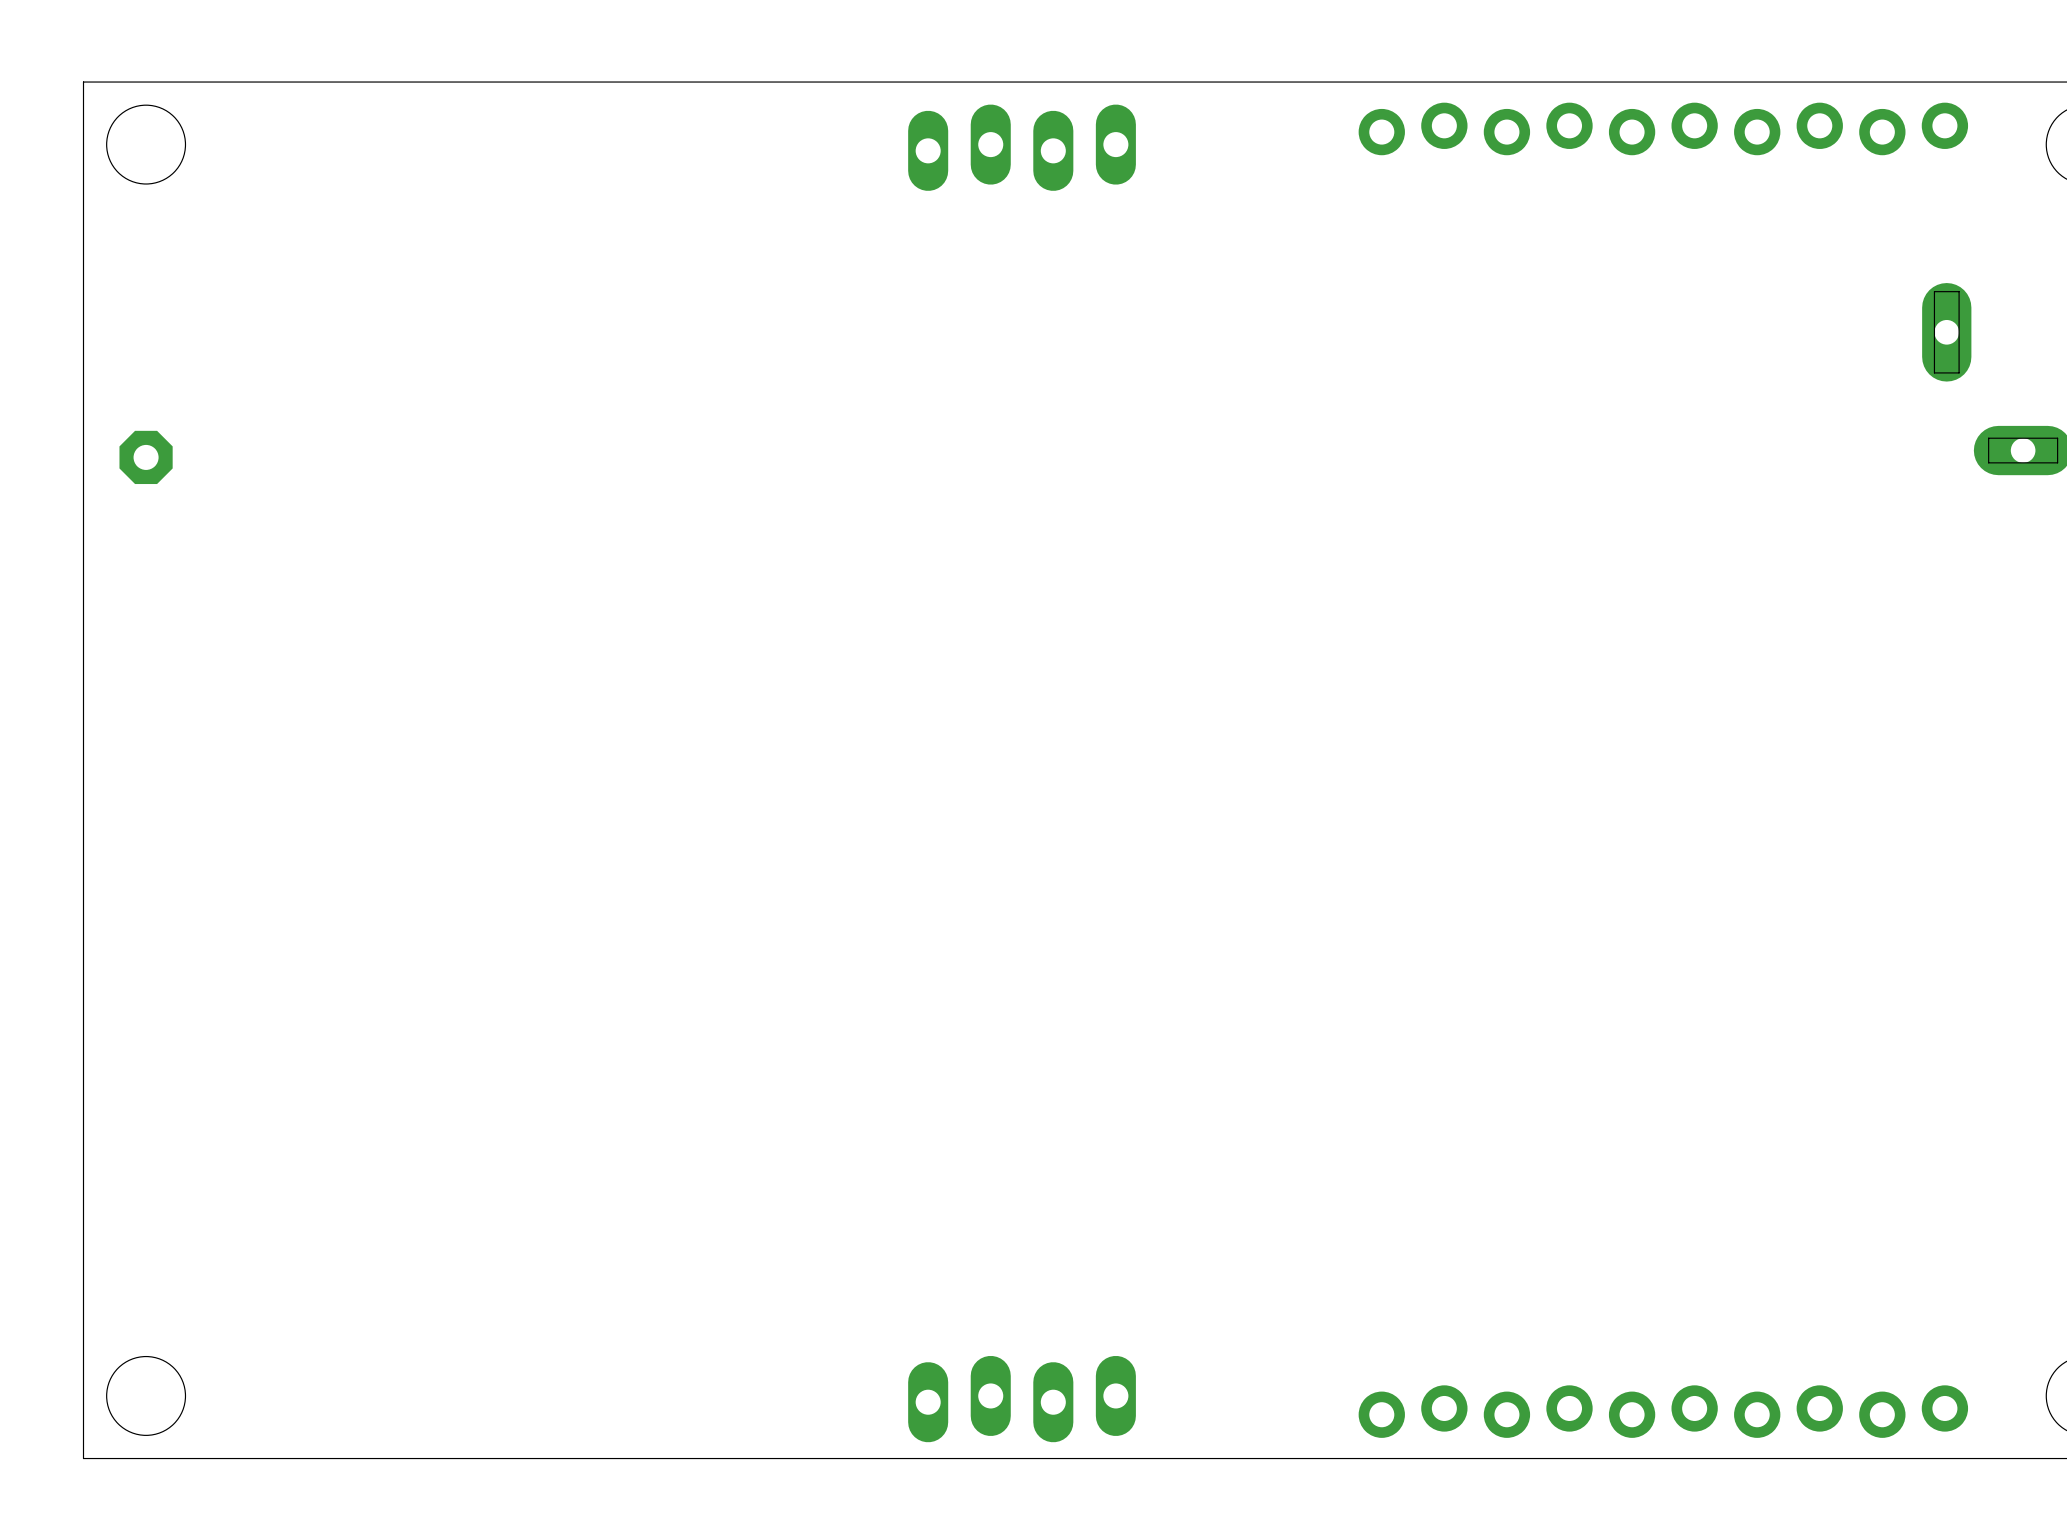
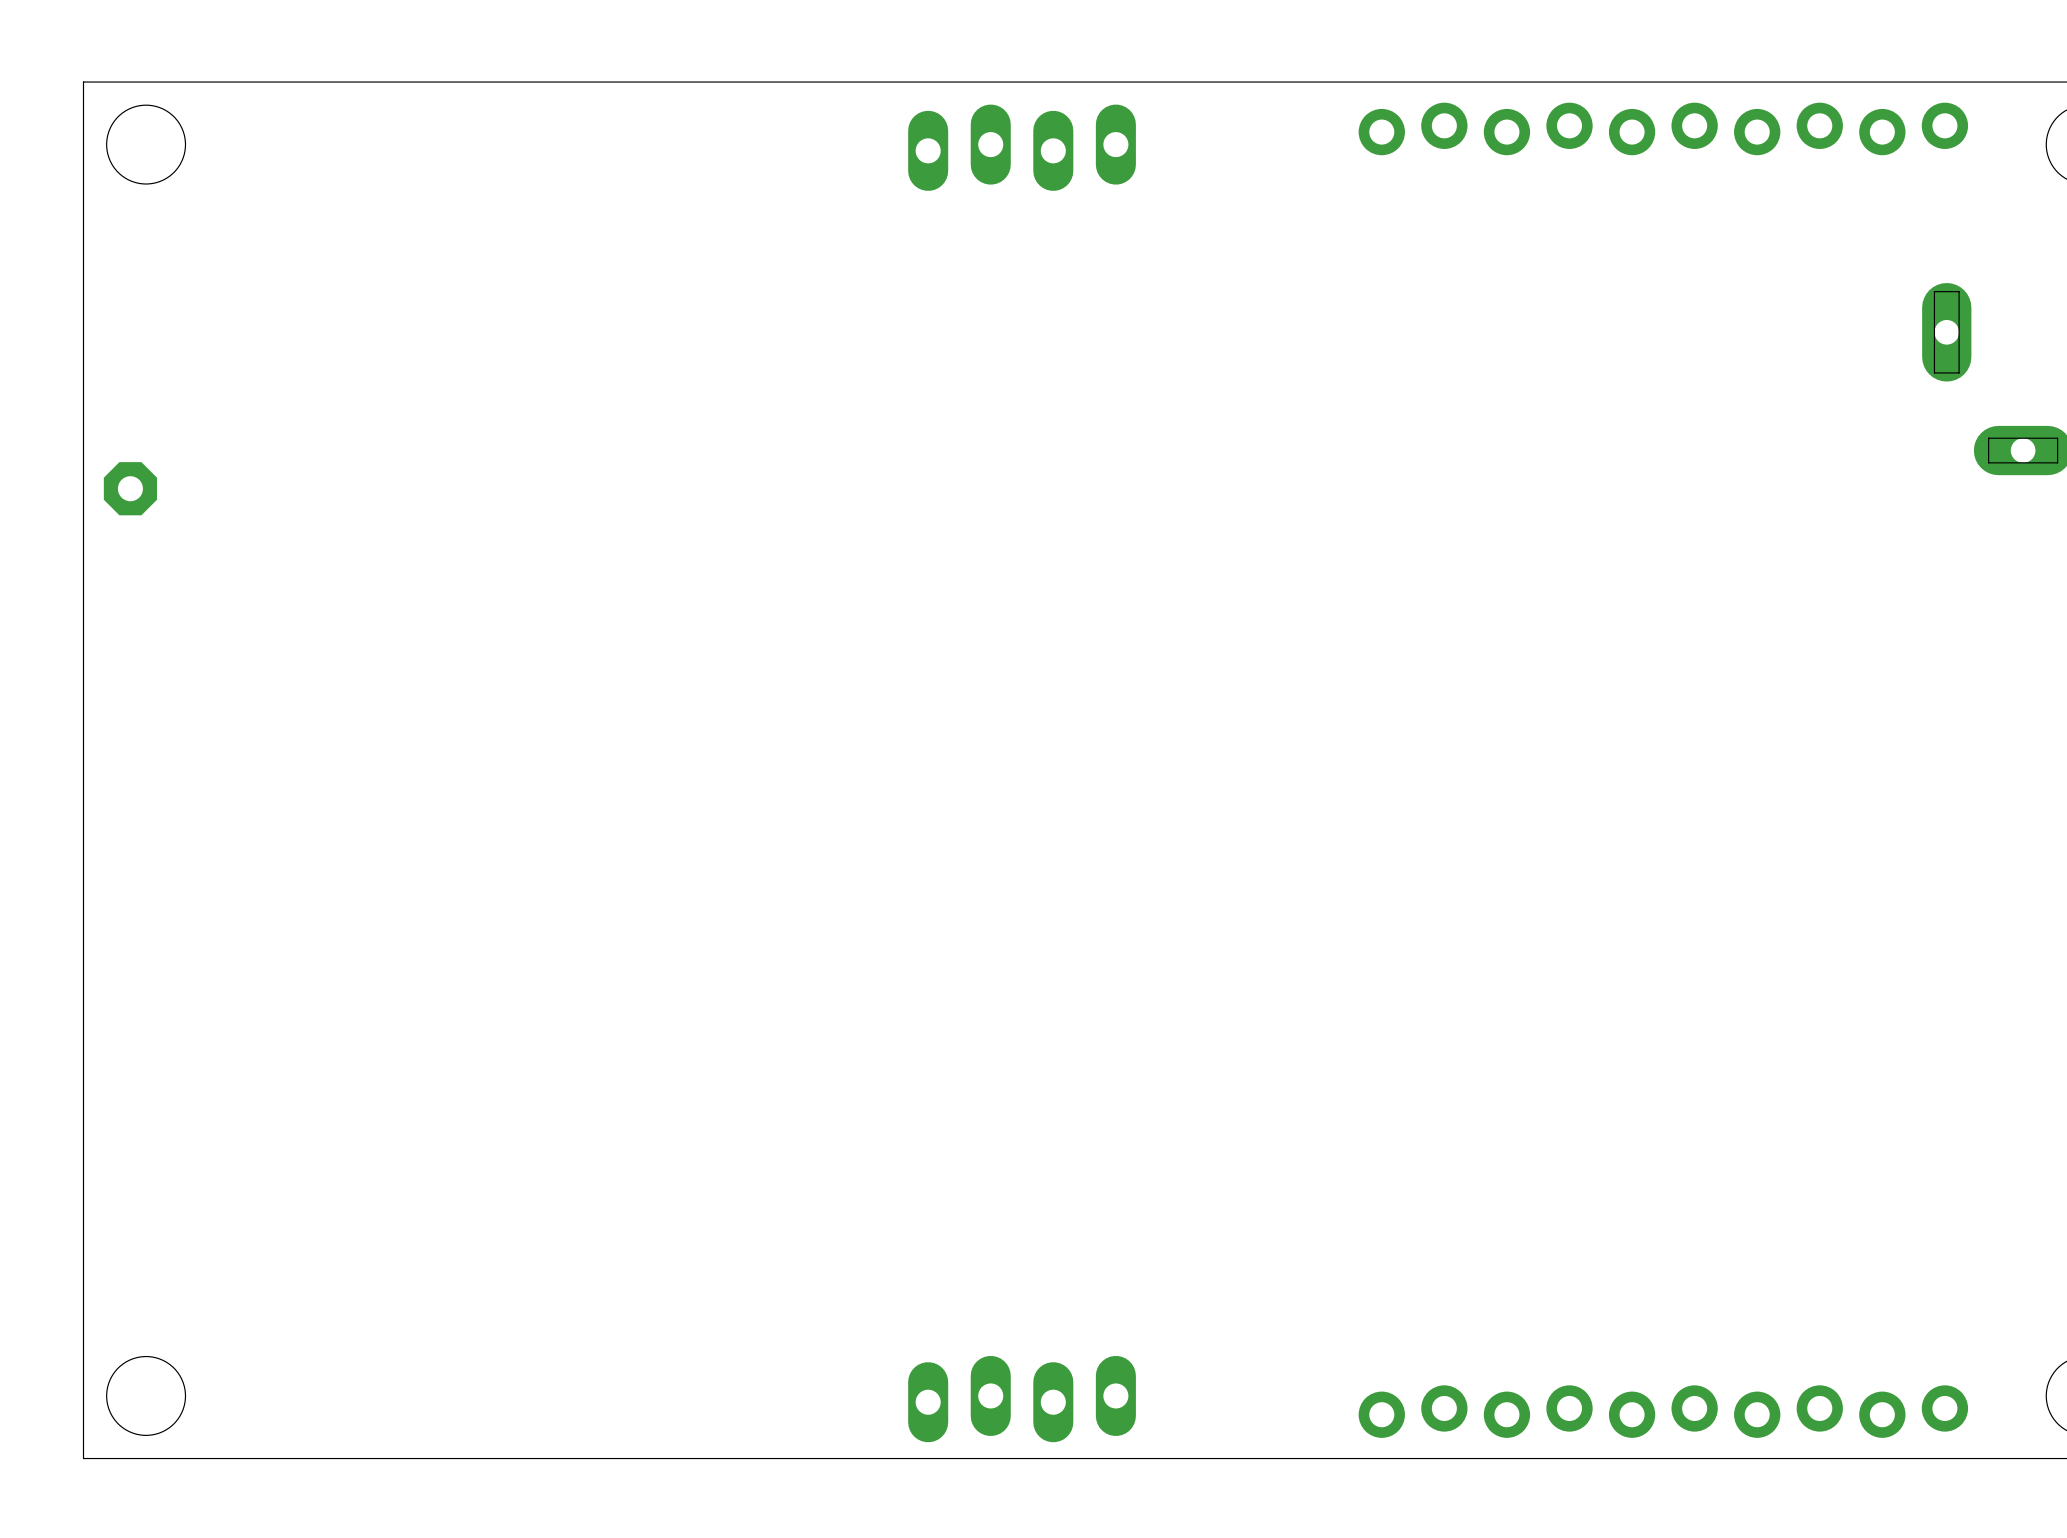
part position: (146, 457) -> (130, 488)

